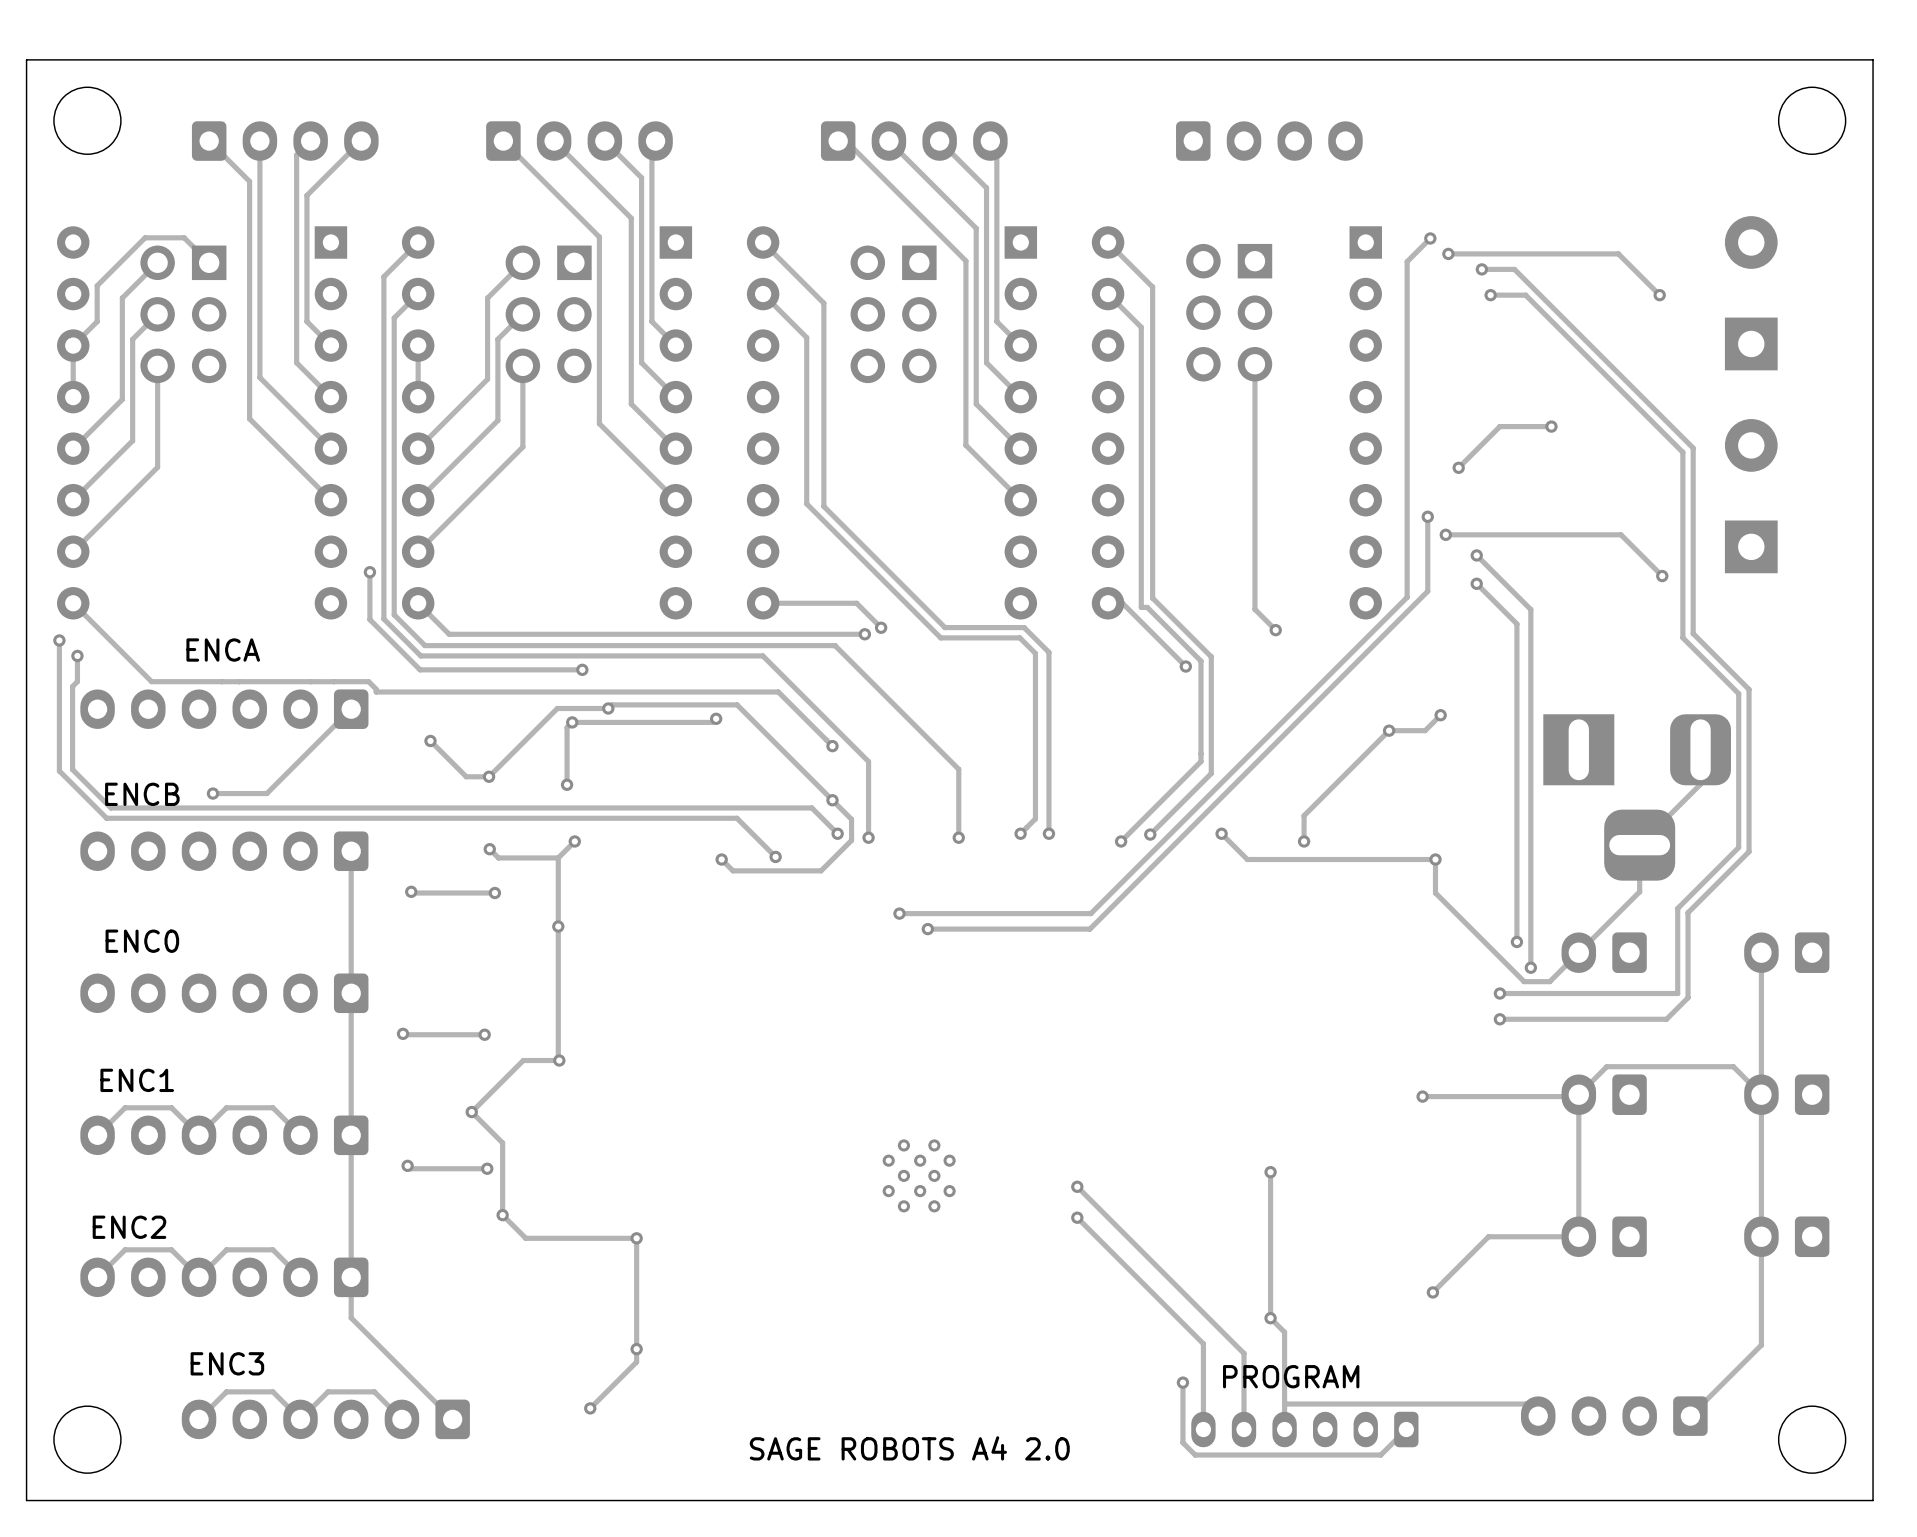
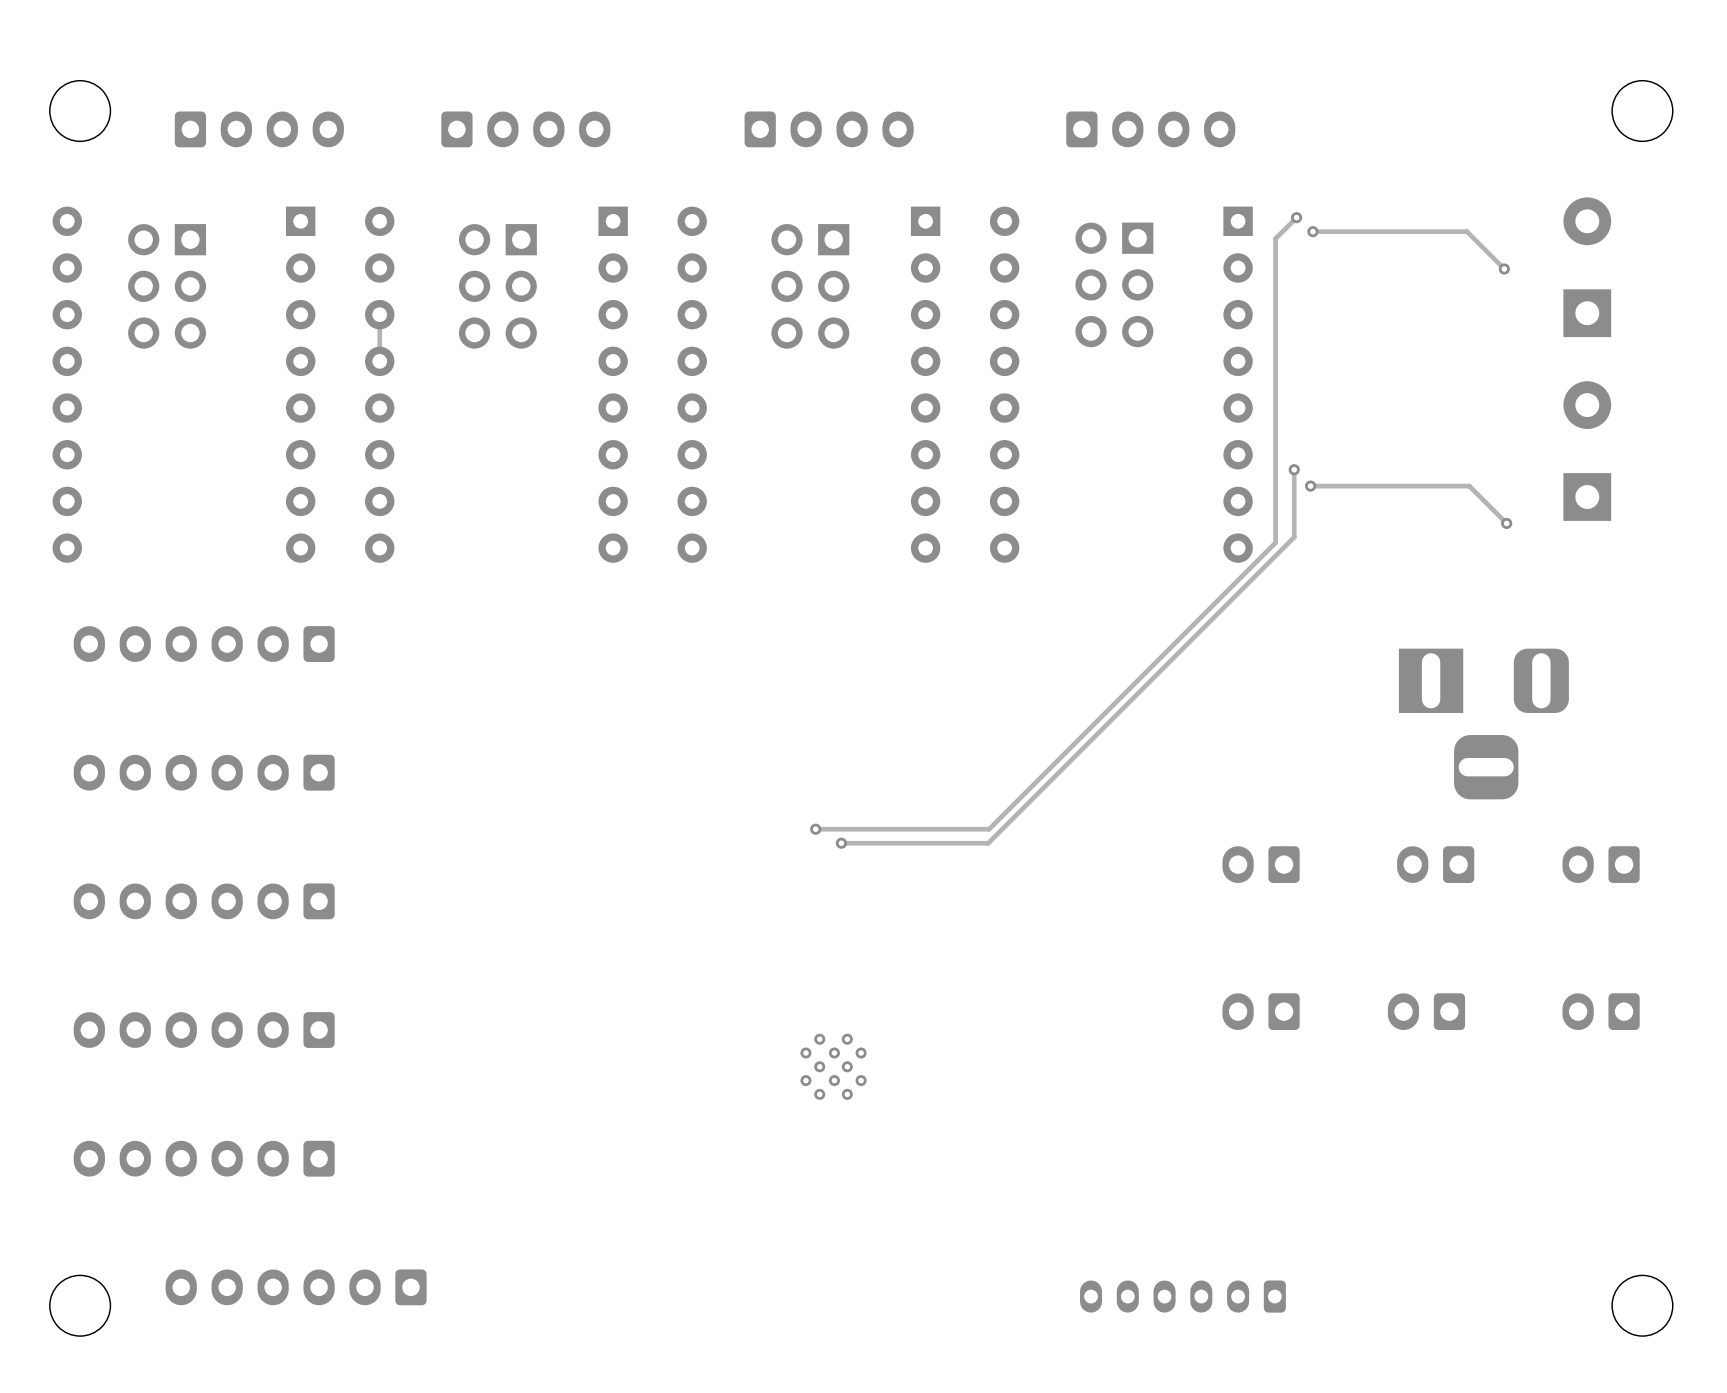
board edge: (1873, 59) (26, 59) (26, 1500) (1873, 1500) (1873, 59) -> none
track: (209, 141) (249, 181) (249, 418) (330, 500) -> none
track: (259, 141) (259, 377) (330, 448) -> none
track: (310, 141) (296, 155) (296, 362) (330, 397) -> none
track: (361, 141) (306, 195) (306, 321) (330, 345) -> none
track: (503, 141) (599, 237) (599, 423) (675, 500) -> none
track: (554, 141) (631, 218) (631, 404) (675, 448) -> none
track: (604, 141) (641, 177) (641, 362) (675, 397) -> none
track: (655, 141) (651, 144) (651, 321) (675, 345) -> none
track: (838, 141) (846, 141) (965, 260) (965, 445) (1020, 500) -> none
track: (888, 141) (976, 228) (976, 404) (1020, 448) -> none
track: (939, 141) (986, 187) (986, 362) (1020, 397) -> none
track: (990, 141) (996, 147) (996, 321) (1020, 345) -> none
track: (418, 242) (383, 276) (383, 619) (420, 655) (762, 655) (868, 761) (868, 837) -> none
track: (763, 242) (823, 303) (823, 506) (944, 627) (1024, 627) (1048, 652) (1048, 833) -> none
track: (1108, 242) (1152, 287) (1152, 598) (1211, 656) (1211, 773) (1150, 834) -> none
track: (157, 262) (122, 298) (122, 399) (73, 448) -> none
track: (209, 262) (184, 237) (145, 237) (97, 285) (97, 321) (73, 345) (73, 397) -> none
track: (522, 262) (487, 298) (487, 379) (418, 448) -> none
track: (1481, 269) (1514, 269) (1693, 448) (1693, 633) (1749, 689) (1749, 851) (1688, 912) (1688, 997) (1666, 1019) (1499, 1019) -> none
via: (1481, 269) -> none
track: (418, 294) (394, 318) (394, 614) (425, 645) (835, 645) (958, 769) (958, 837) -> none
track: (763, 294) (806, 337) (806, 503) (940, 637) (1019, 637) (1035, 653) (1035, 818) (1020, 833) -> none
track: (1108, 294) (1141, 327) (1141, 607) (1147, 607) (1200, 661) (1200, 761) (1121, 841) -> none
track: (1490, 295) (1525, 295) (1682, 452) (1682, 637) (1738, 693) (1738, 847) (1677, 908) (1677, 993) (1499, 993) -> none
via: (1490, 295) -> none
track: (157, 314) (132, 339) (132, 440) (73, 500) -> none
track: (522, 314) (497, 339) (497, 420) (418, 500) -> none
track: (1254, 364) (1254, 609) (1275, 630) -> none
track: (157, 365) (157, 467) (73, 551) -> none
track: (522, 365) (522, 447) (418, 551) -> none
track: (1551, 426) (1499, 426) (1458, 467) -> none
via: (1551, 426) -> none
via: (1458, 467) -> none
track: (1476, 555) (1530, 609) (1530, 967) -> none
via: (1476, 555) -> none
track: (369, 572) (369, 619) (420, 669) (582, 669) -> none
via: (369, 572) -> none
track: (1476, 583) (1516, 623) (1516, 941) -> none
via: (1476, 583) -> none
track: (73, 603) (151, 681) (368, 681) (376, 689) (376, 692) (778, 692) (832, 746) -> none
track: (418, 603) (449, 634) (864, 634) -> none
track: (763, 603) (856, 603) (881, 627) -> none
track: (1108, 603) (1122, 603) (1185, 666) -> none
via: (881, 627) -> none
via: (1275, 630) -> none
via: (864, 634) -> none
track: (59, 640) (59, 771) (106, 818) (736, 818) (775, 856) -> none
via: (59, 640) -> none
text: ENCA (223, 650) -> none
track: (77, 655) (77, 681) (72, 686) (72, 769) (110, 807) (811, 807) (837, 833) -> none
via: (77, 655) -> none
via: (1185, 666) -> none
via: (582, 669) -> none
via: (608, 708) -> none
track: (351, 709) (266, 793) (212, 793) -> none
track: (1440, 715) (1425, 730) (1389, 730) (1304, 815) (1304, 841) -> none
via: (1440, 715) -> none
track: (716, 718) (712, 722) (572, 722) (567, 727) (567, 784) -> none
via: (716, 718) -> none
via: (572, 722) -> none
via: (1389, 730) -> none
track: (430, 740) (466, 776) (489, 776) (557, 708) (608, 708) (611, 704) (737, 704) (851, 819) (851, 840) (821, 870) (733, 870) (721, 859) -> none
via: (430, 740) -> none
via: (832, 746) -> none
track: (1700, 749) (1700, 784) (1639, 845) (1639, 891) (1549, 981) (1524, 981) (1435, 892) (1435, 859) (1247, 859) (1221, 833) -> none
via: (489, 776) -> none
via: (567, 784) -> none
via: (212, 793) -> none
text: ENCB (142, 794) -> none
via: (832, 800) -> none
via: (837, 833) -> none
via: (1020, 833) -> none
via: (1048, 833) -> none
via: (1221, 833) -> none
via: (1150, 834) -> none
via: (868, 837) -> none
via: (958, 837) -> none
track: (574, 841) (558, 857) -> none
via: (574, 841) -> none
via: (1121, 841) -> none
via: (1304, 841) -> none
track: (489, 849) (498, 857) (558, 857) -> none
via: (489, 849) -> none
track: (351, 851) (351, 1317) (452, 1419) -> none
via: (775, 856) -> none
track: (558, 857) (559, 1060) (523, 1060) (471, 1112) (502, 1142) (502, 1215) (525, 1238) (636, 1238) (636, 1362) (590, 1408) -> none
via: (721, 859) -> none
via: (1435, 859) -> none
track: (411, 891) (494, 893) -> none
via: (411, 891) -> none
via: (494, 893) -> none
via: (558, 926) -> none
text: ENC0 (142, 941) -> none
via: (1516, 941) -> none
part: none -> (1261, 864)
part position: (1604, 952) -> (1435, 864)
track: (1761, 952) (1761, 1345) (1690, 1416) -> none
part position: (1786, 952) -> (1601, 864)
via: (1530, 967) -> none
via: (1499, 993) -> none
via: (1499, 1019) -> none
track: (403, 1033) (484, 1034) -> none
via: (403, 1033) -> none
via: (484, 1034) -> none
via: (559, 1060) -> none
text: ENC1 (137, 1080) -> none
track: (1578, 1094) (1578, 1236) (1488, 1236) (1432, 1292) -> none
part position: (1604, 1094) -> (1426, 1011)
track: (1761, 1094) (1733, 1066) (1606, 1066) (1576, 1096) (1422, 1096) -> none
part position: (1786, 1094) -> (1601, 1011)
via: (1422, 1096) -> none
via: (471, 1112) -> none
part: none -> (1261, 1011)
track: (300, 1135) (272, 1107) (226, 1107) (199, 1135) (171, 1107) (125, 1107) (97, 1135) -> none
track: (407, 1165) (410, 1168) (487, 1168) -> none
via: (407, 1165) -> none
via: (487, 1168) -> none
track: (1270, 1172) (1270, 1318) (1284, 1332) (1284, 1429) -> none
via: (1270, 1172) -> none
track: (1077, 1186) (1244, 1353) (1244, 1429) -> none
via: (1077, 1186) -> none
via: (502, 1215) -> none
track: (1077, 1217) (1203, 1343) (1203, 1429) -> none
via: (1077, 1217) -> none
text: ENC2 (129, 1227) -> none
part: (1604, 1236) -> none
part: (1786, 1236) -> none
via: (636, 1238) -> none
track: (300, 1277) (272, 1249) (226, 1249) (199, 1277) (171, 1249) (125, 1249) (97, 1277) -> none
via: (1432, 1292) -> none
via: (1270, 1318) -> none
via: (636, 1349) -> none
text: ENC3 (227, 1363) -> none
text: PROGRAM (1291, 1376) -> none
track: (1182, 1382) (1182, 1442) (1195, 1455) (1380, 1455) (1406, 1429) -> none
via: (1182, 1382) -> none
track: (1284, 1404) (1526, 1404) (1538, 1416) -> none
via: (590, 1408) -> none
part: (1614, 1416) -> none
track: (401, 1419) (374, 1391) (328, 1391) (300, 1419) (272, 1391) (226, 1391) (199, 1419) -> none
text: SAGE ROBOTS A4 2.0 (909, 1448) -> none

